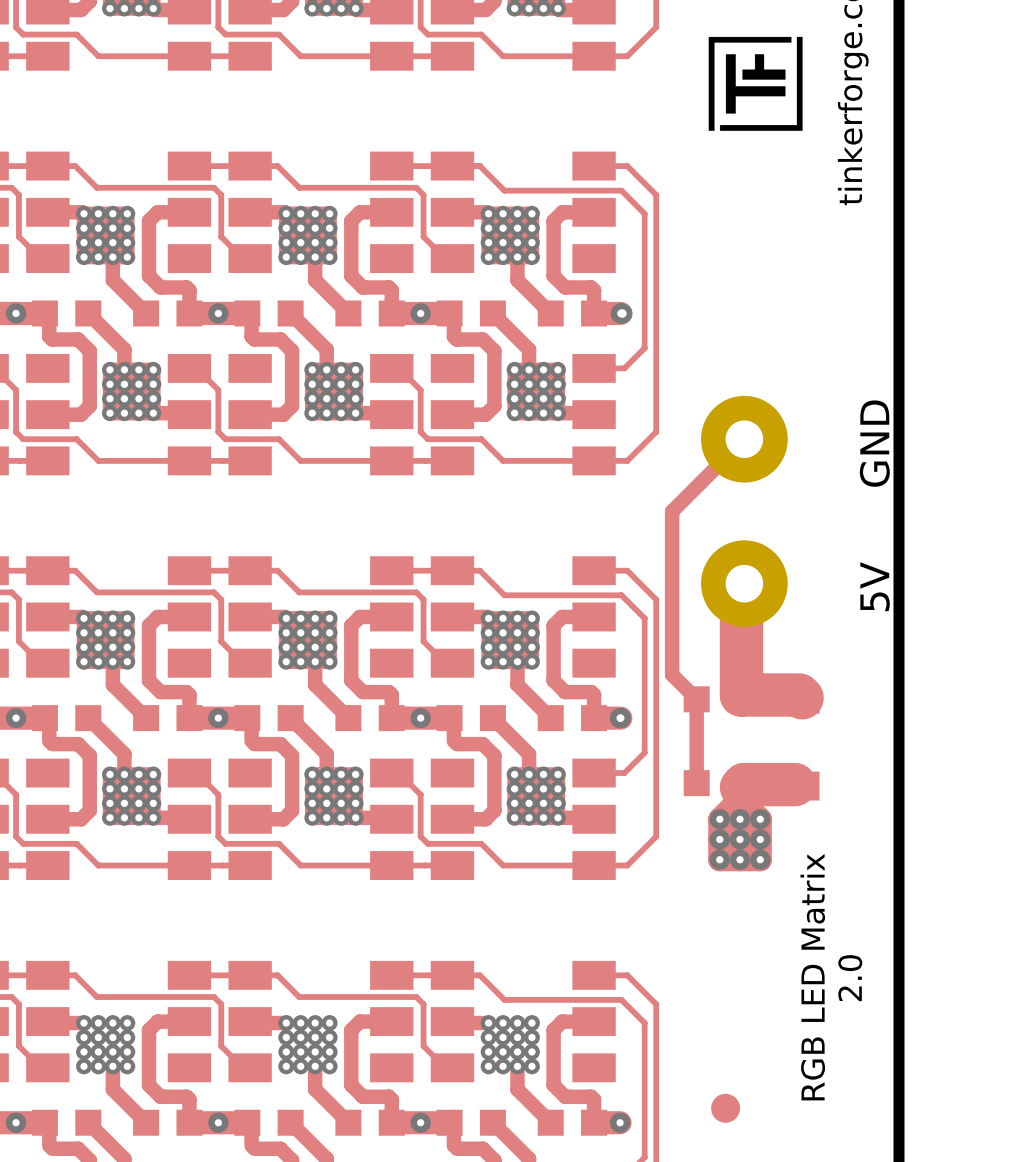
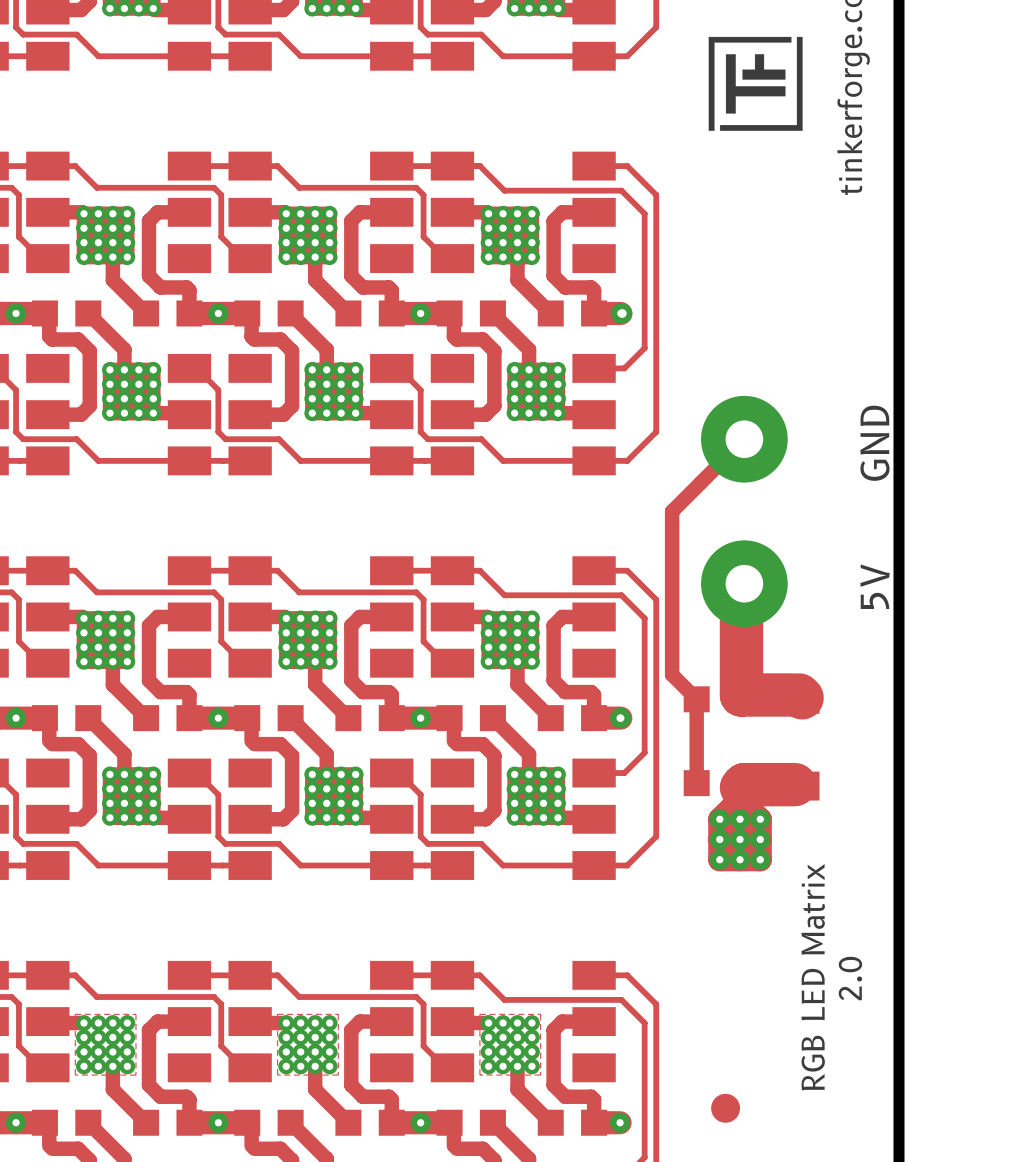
zone outline: none -> (75, 1014) (135, 1014) (135, 1075) (75, 1075) (75, 1014)
zone outline: none -> (277, 1014) (338, 1014) (338, 1075) (277, 1075) (277, 1014)
zone outline: none -> (479, 1014) (540, 1014) (540, 1075) (479, 1075) (479, 1014)

